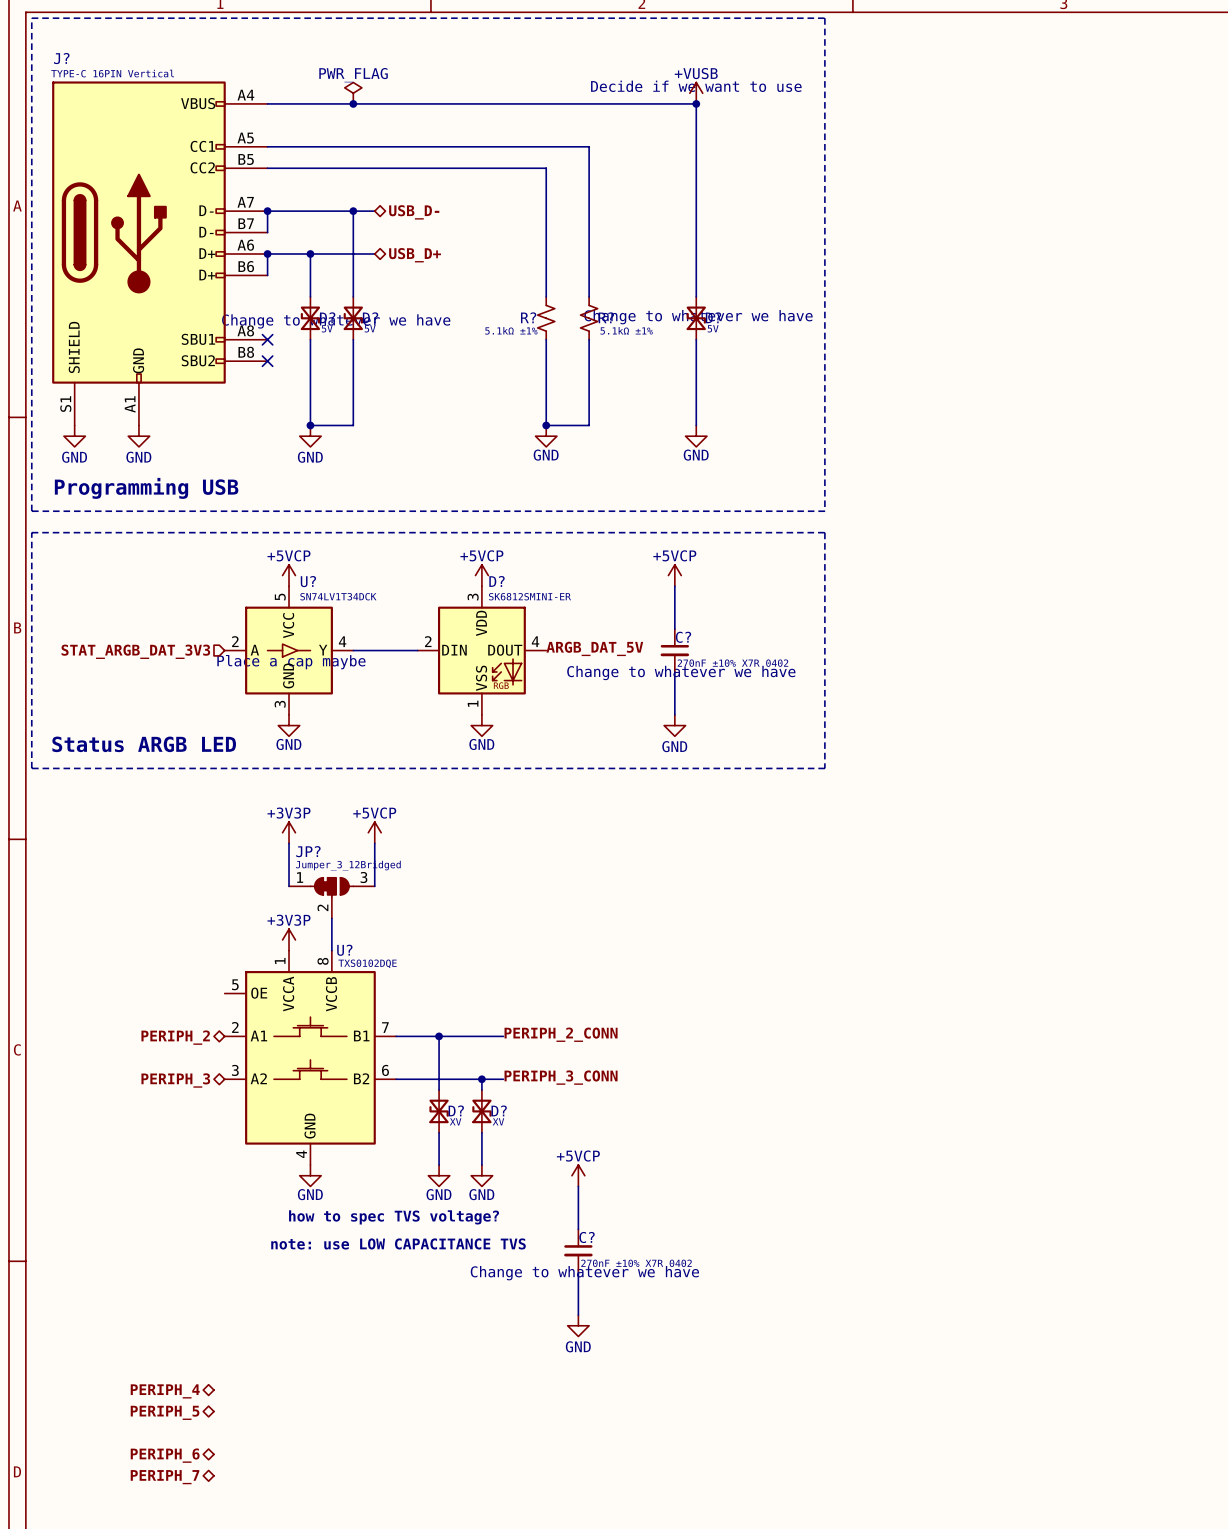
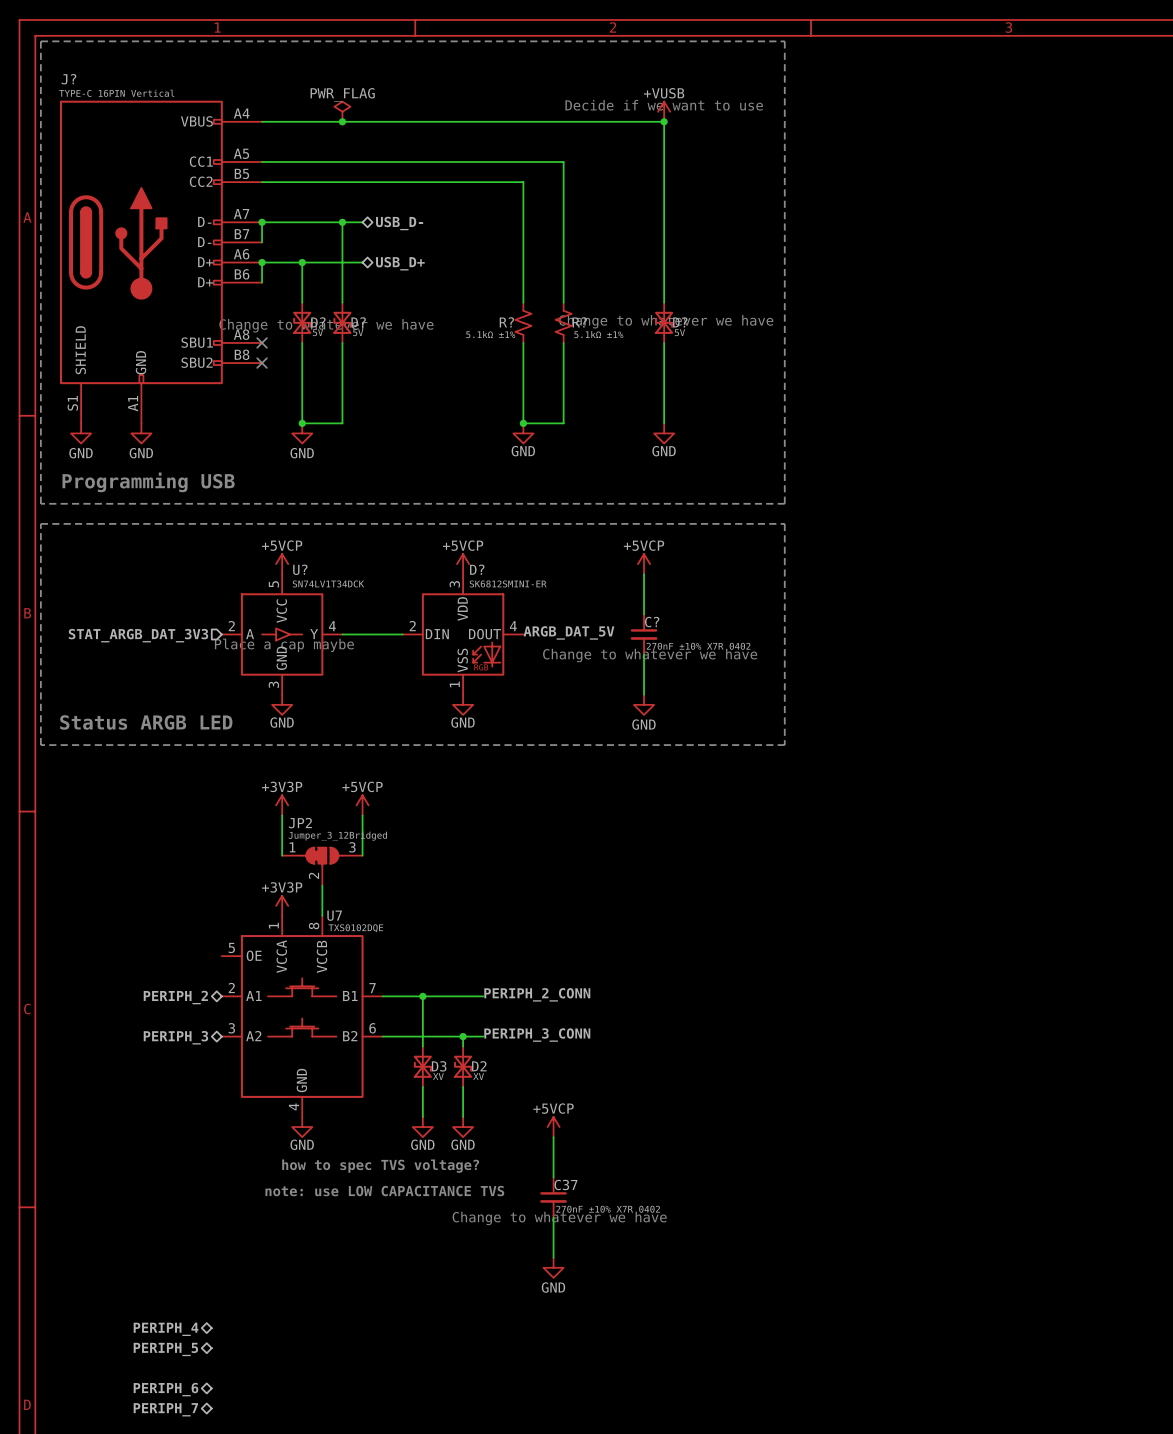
JP? name: JP? (308, 851) -> JP2 (300, 823)
U? name: U? (344, 950) -> U7 (334, 915)
D? name: D? (456, 1110) -> D3 (439, 1066)
D? name: D? (499, 1110) -> D2 (479, 1066)
C? name: C? (587, 1237) -> C37 (565, 1184)

